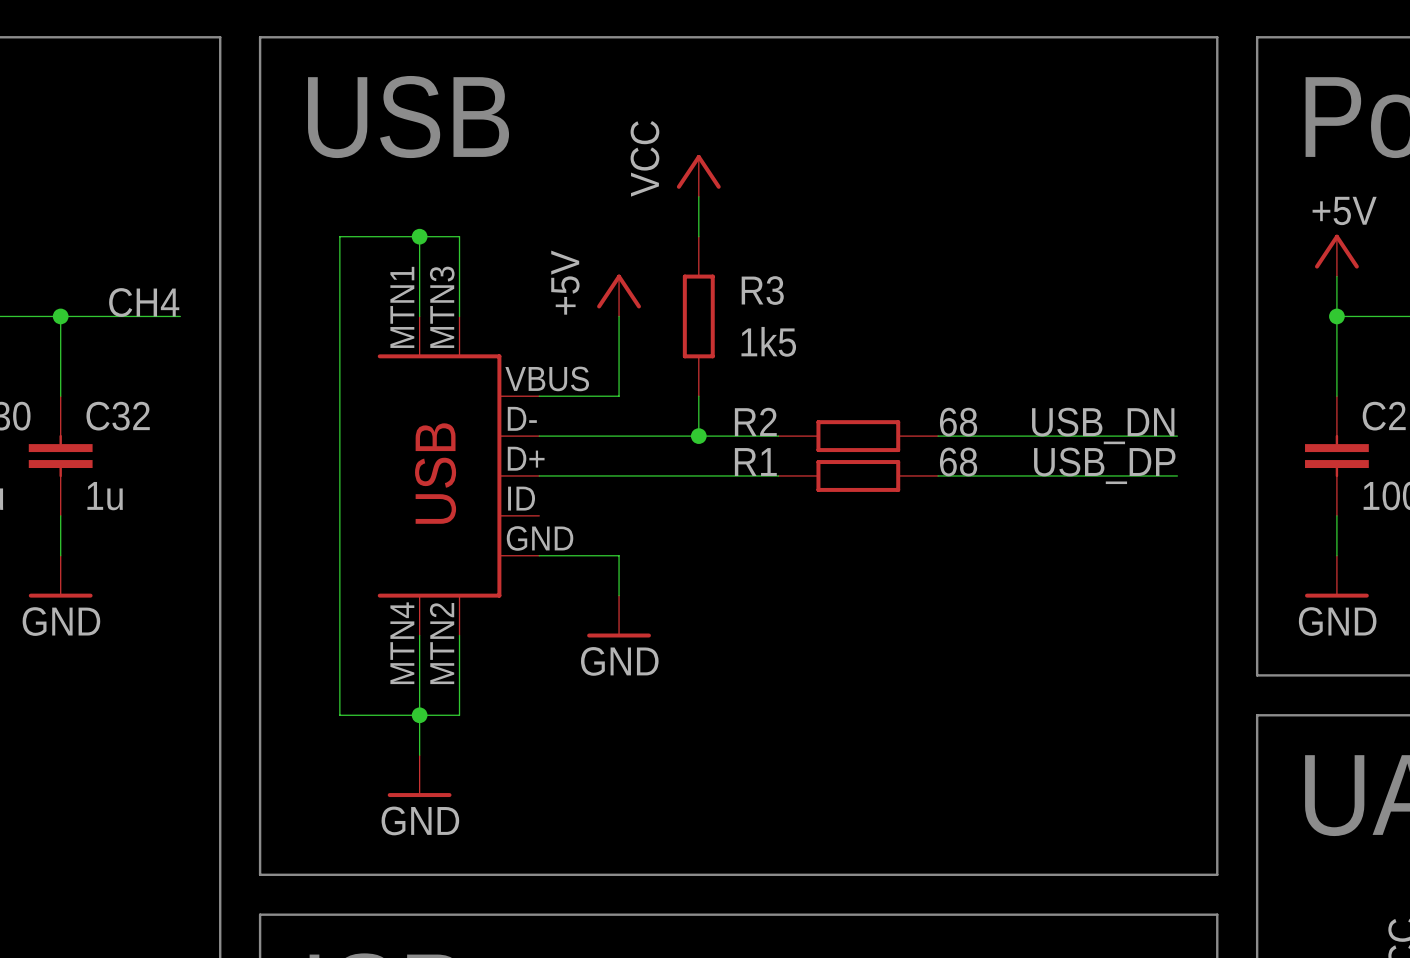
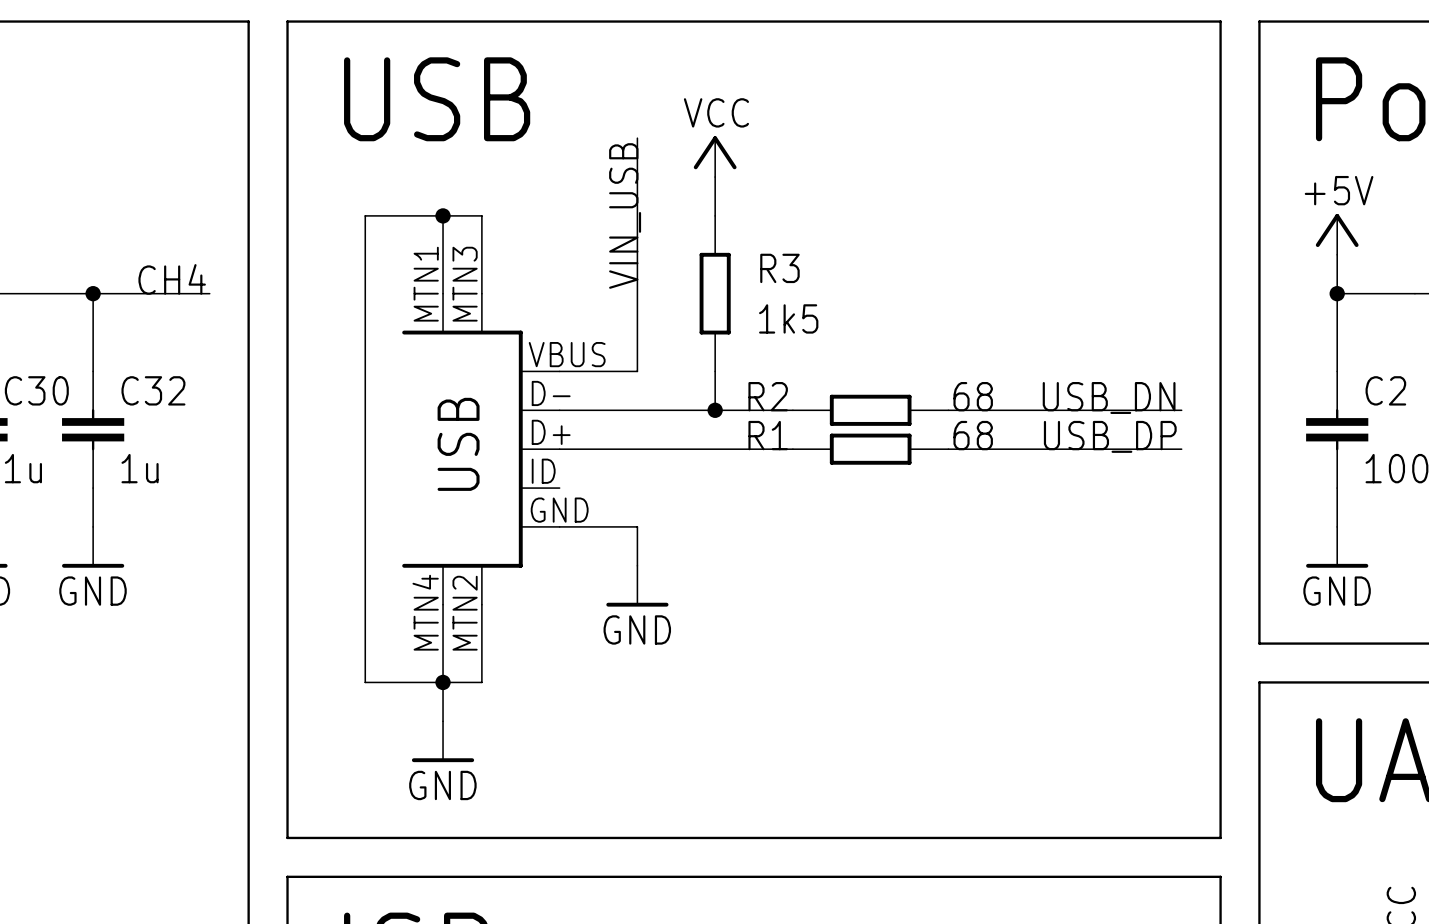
wire: none -> (637, 138) (637, 293)
power symbol text rotation: 0° (644, 158) -> 90° clockwise (716, 112)
label: none -> VIN_USB (625, 215)
power symbol: +5V (619, 295) -> none

